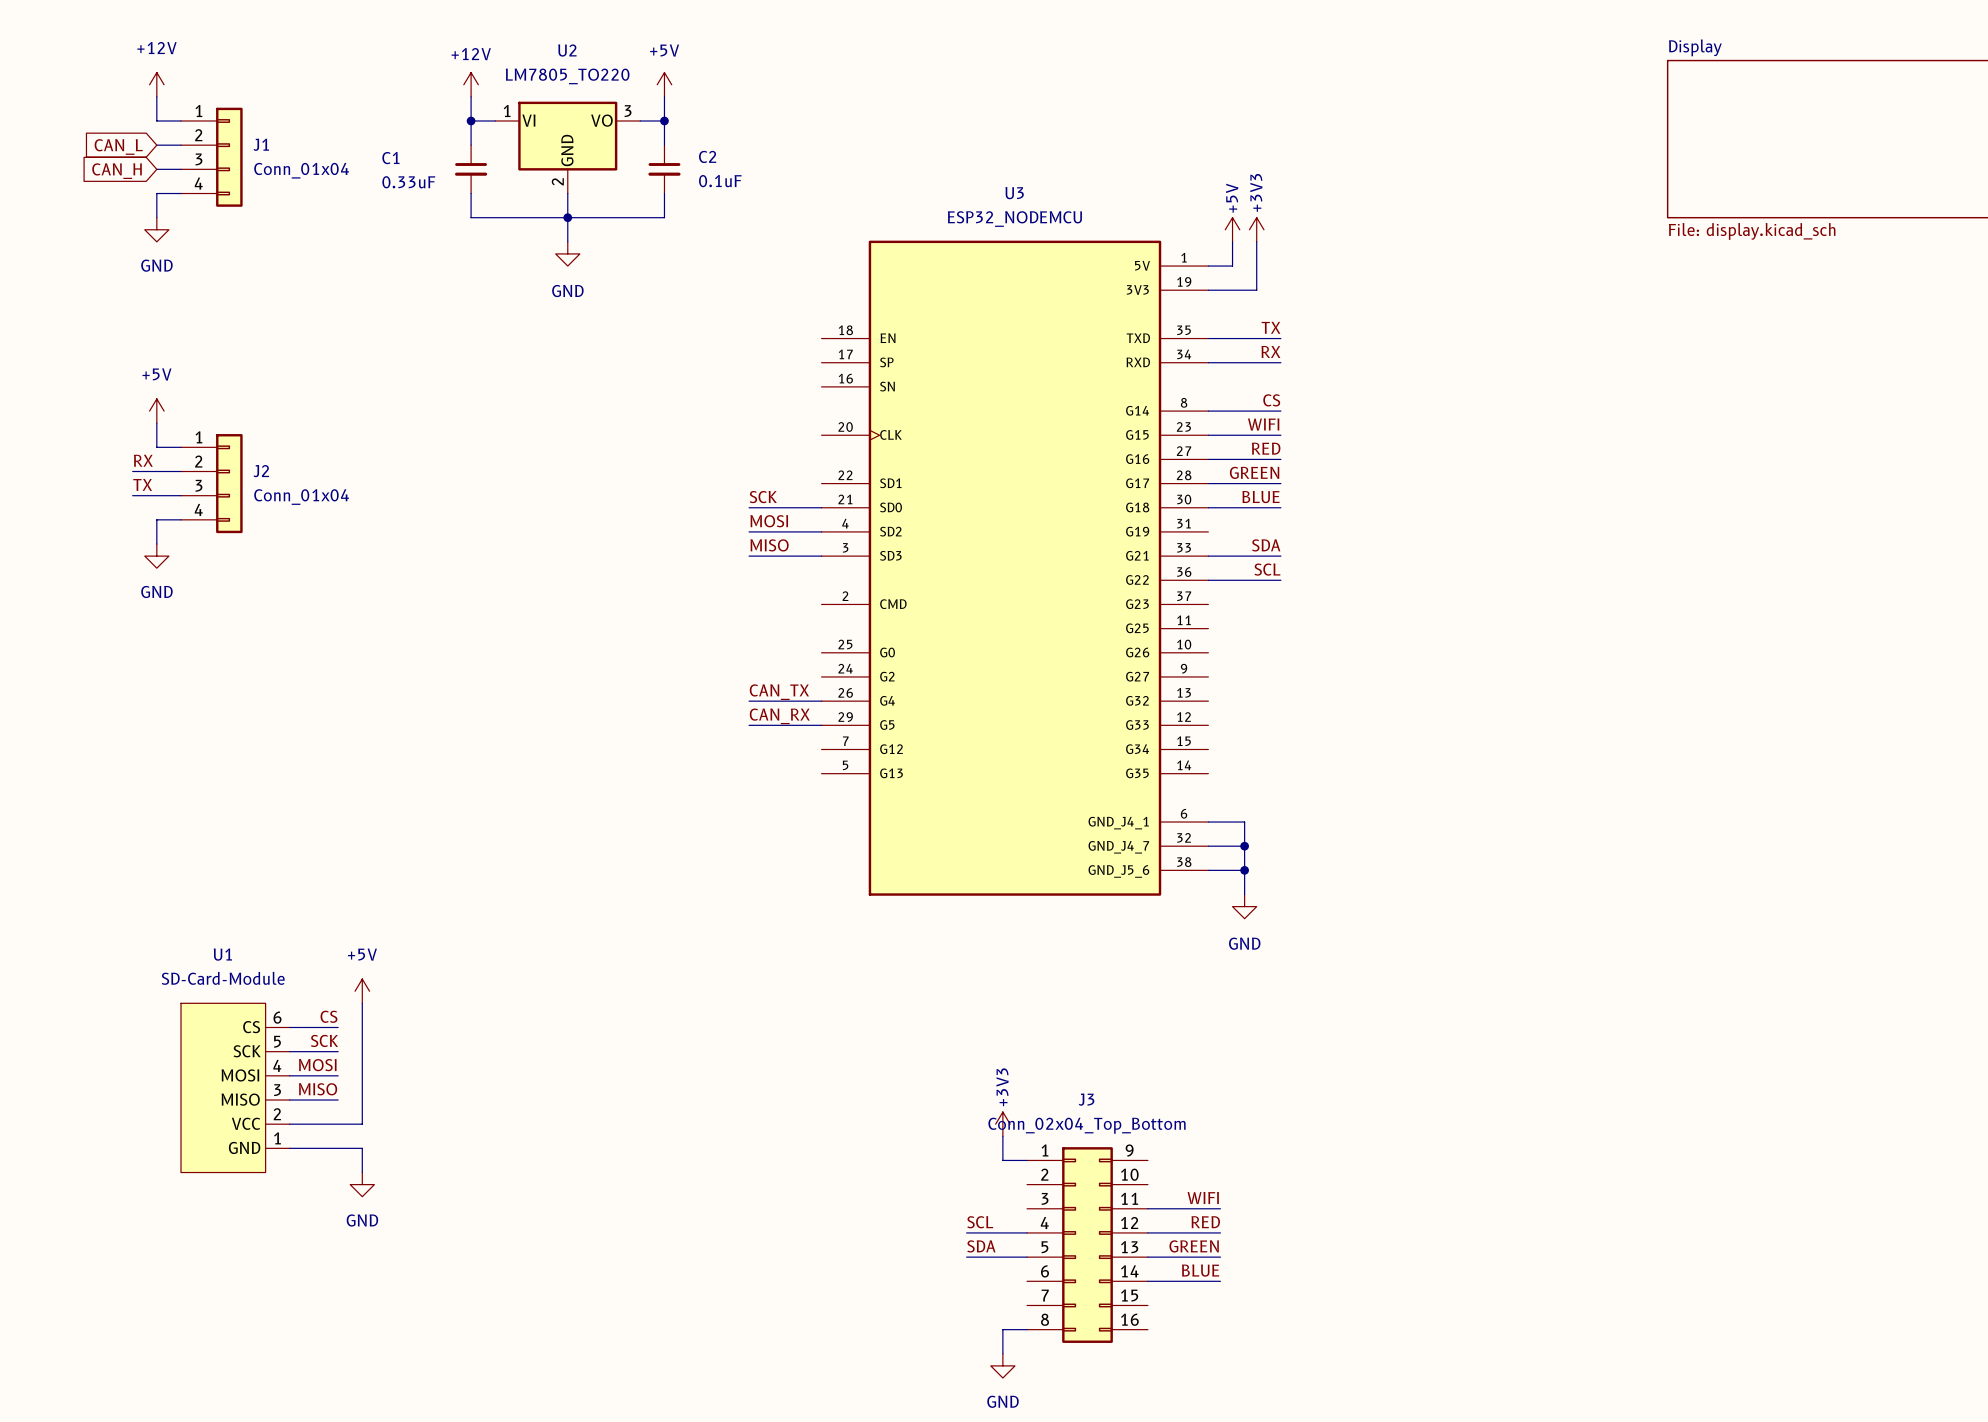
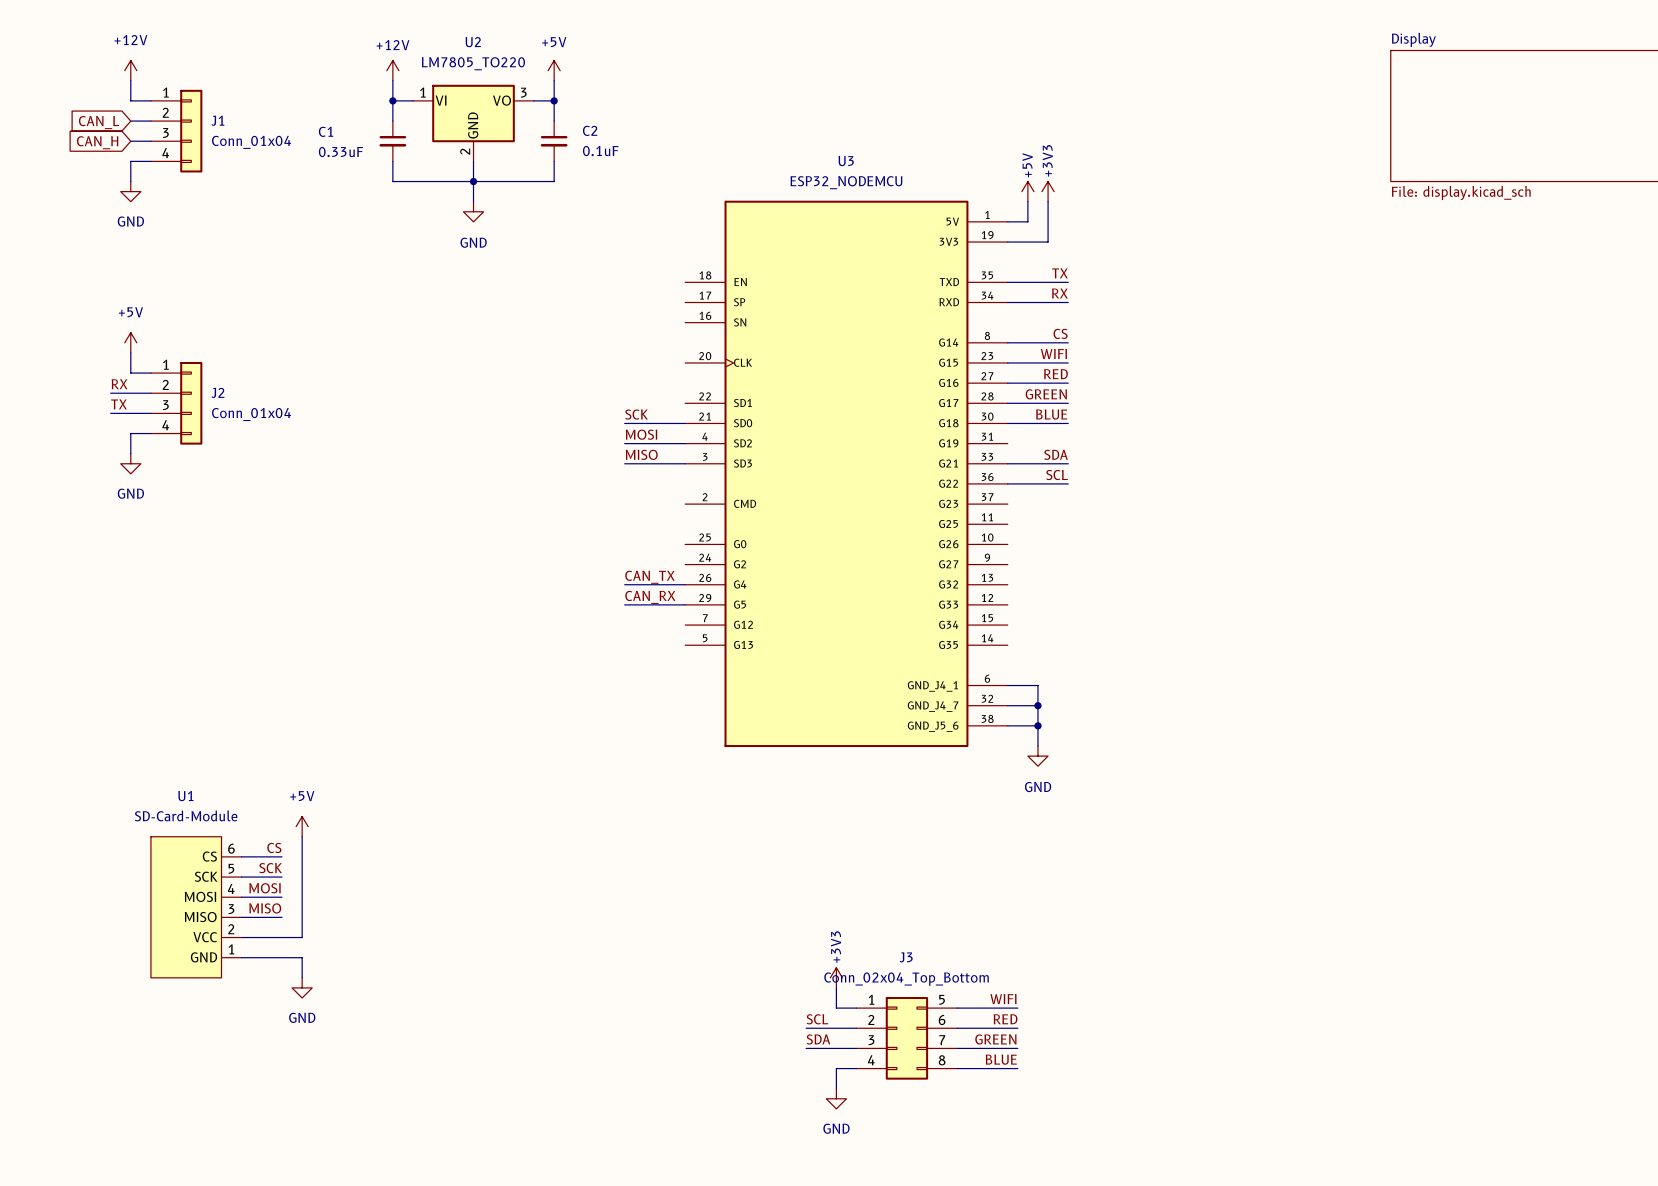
J3 name position: J3 (1086, 1099) -> J3 (906, 957)
power symbol position: +3V3 (1002, 1124) -> +3V3 (836, 977)
J3 value position: Conn_02x04_Top_Bottom (1087, 1125) -> Conn_02x04_Top_Bottom (906, 979)
wire: (1002, 1136) (1002, 1160) (1027, 1160) -> (836, 987) (836, 1008) (856, 1008)
J3 symbol: [1027, 1147, 1148, 1343] -> [856, 997, 958, 1080]
wire: (1027, 1329) (1002, 1329) (1002, 1353) -> (856, 1068) (836, 1068) (836, 1088)
power symbol position: GND (1002, 1365) -> GND (836, 1098)

